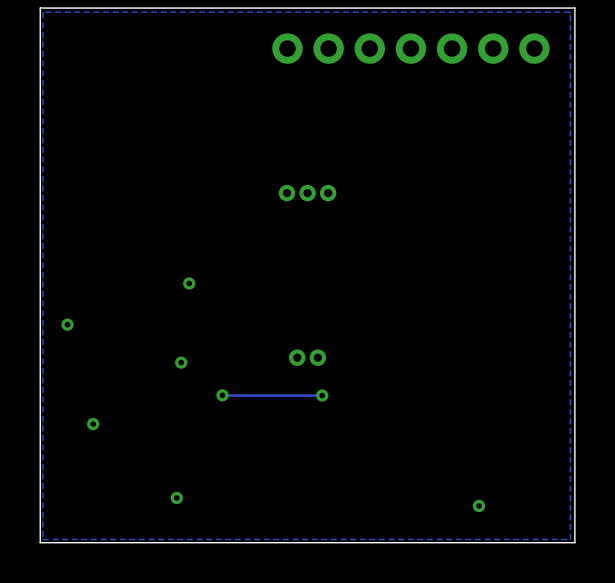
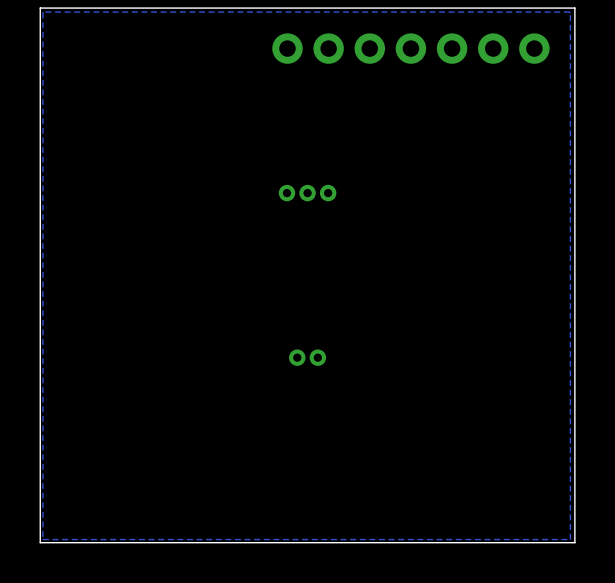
via: (189, 283) -> none
via: (67, 324) -> none
via: (181, 362) -> none
via: (222, 395) -> none
track: (322, 395) (222, 395) -> none
via: (322, 395) -> none
via: (93, 424) -> none
via: (176, 497) -> none
via: (479, 505) -> none

